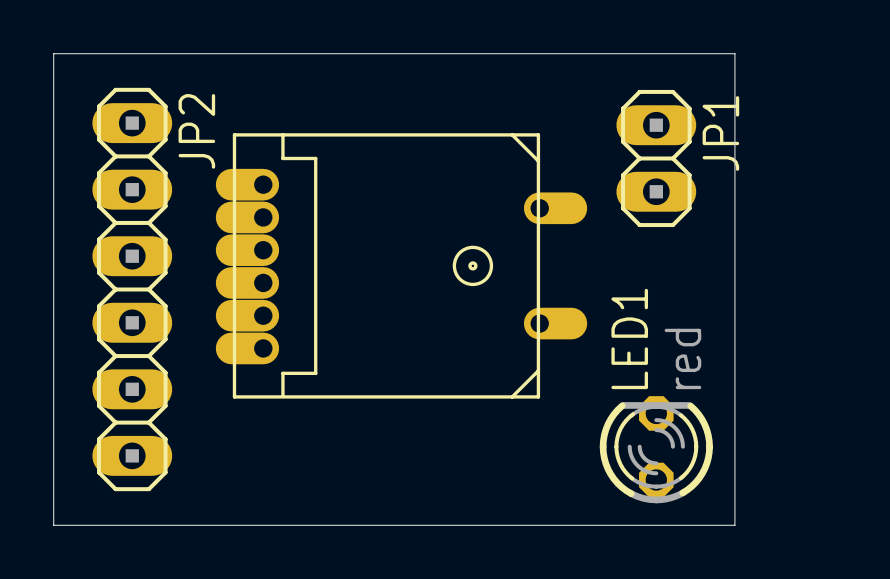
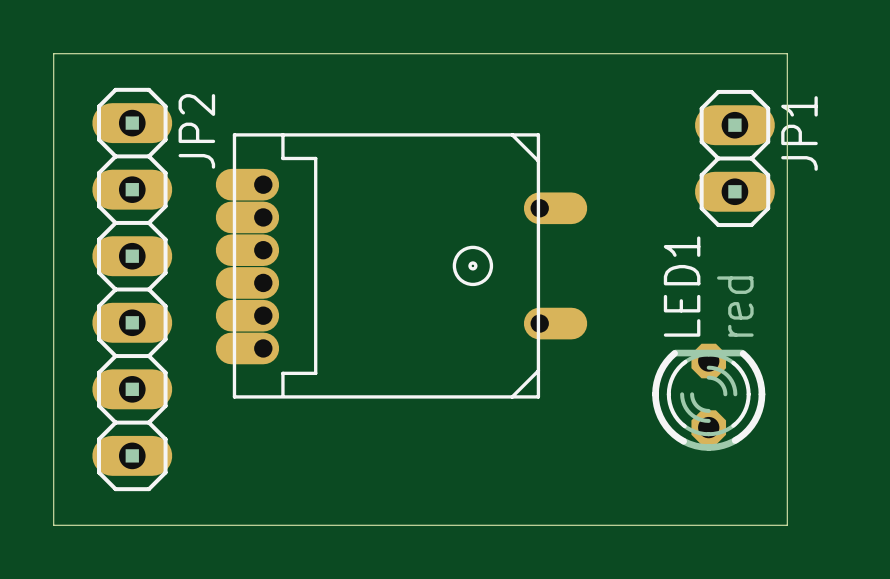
board edge: (734, 53) (734, 525) -> (734, 53) (787, 53) (787, 525) (734, 525)
JP1 position: (656, 158) -> (734, 158)
LED1 position: (656, 449) -> (708, 397)

